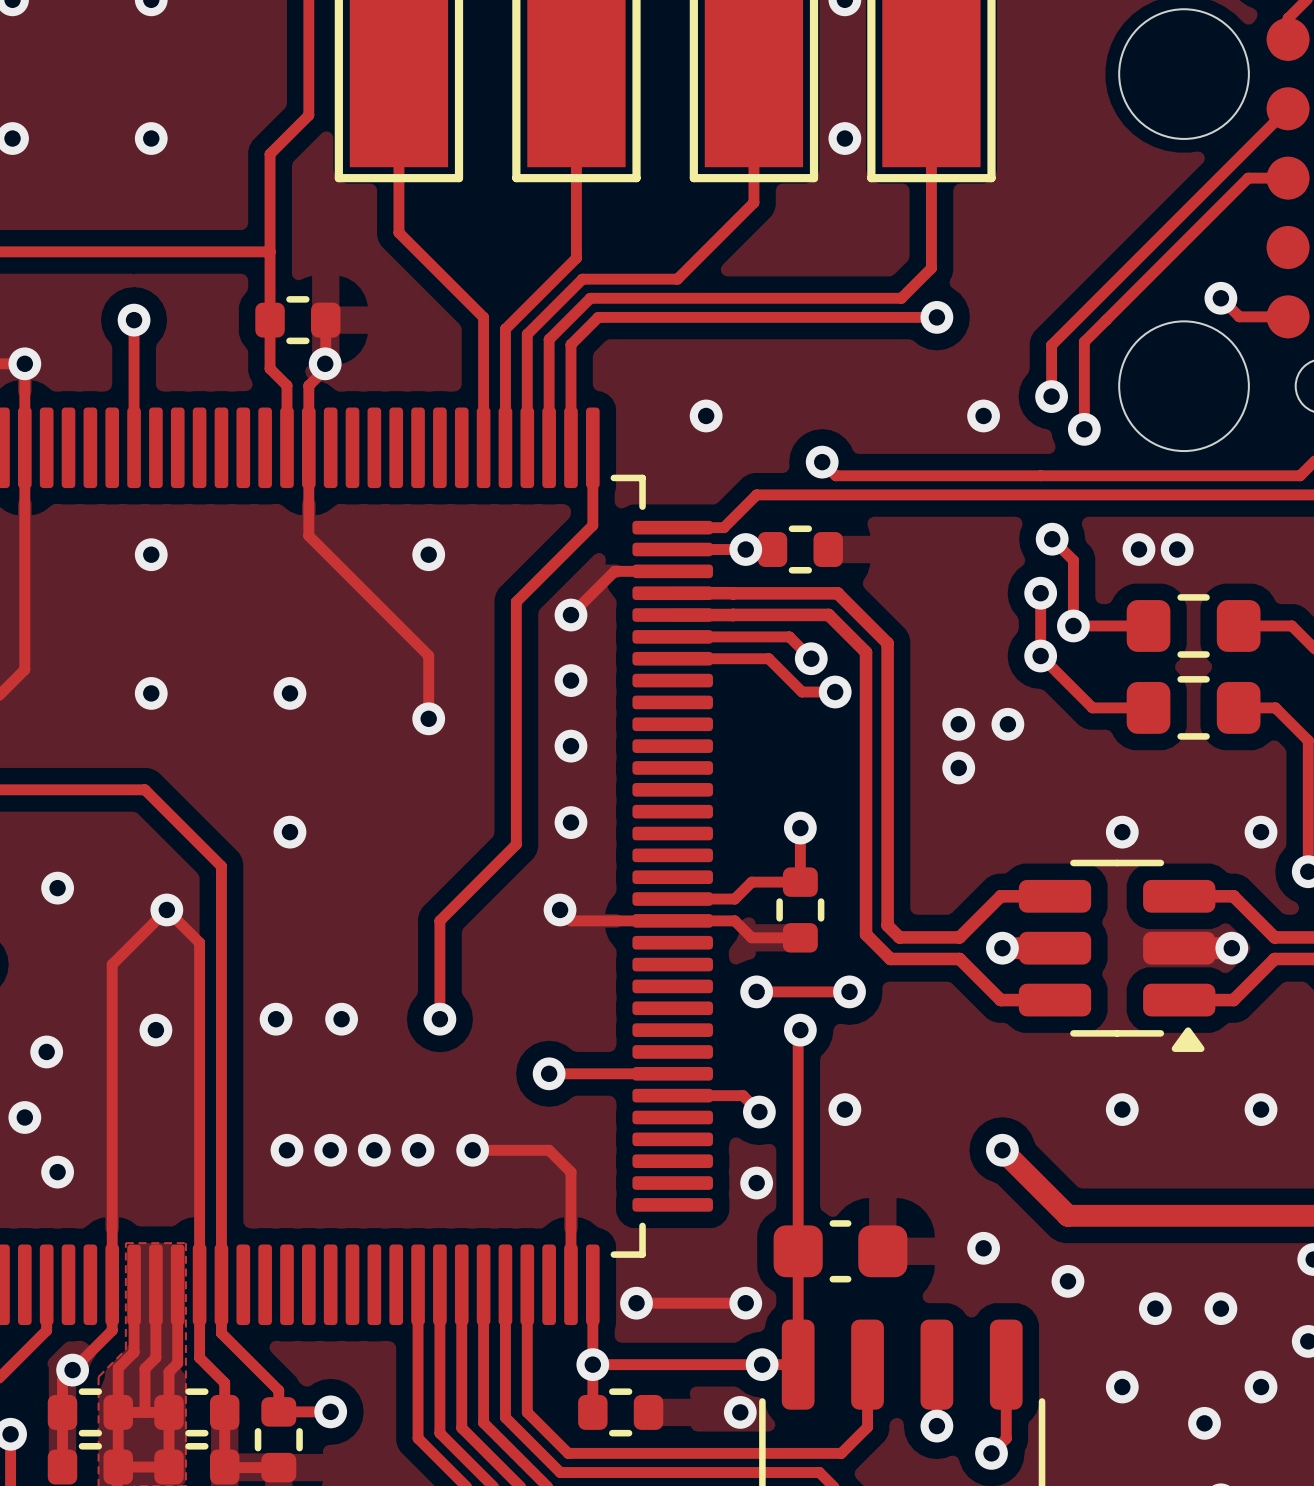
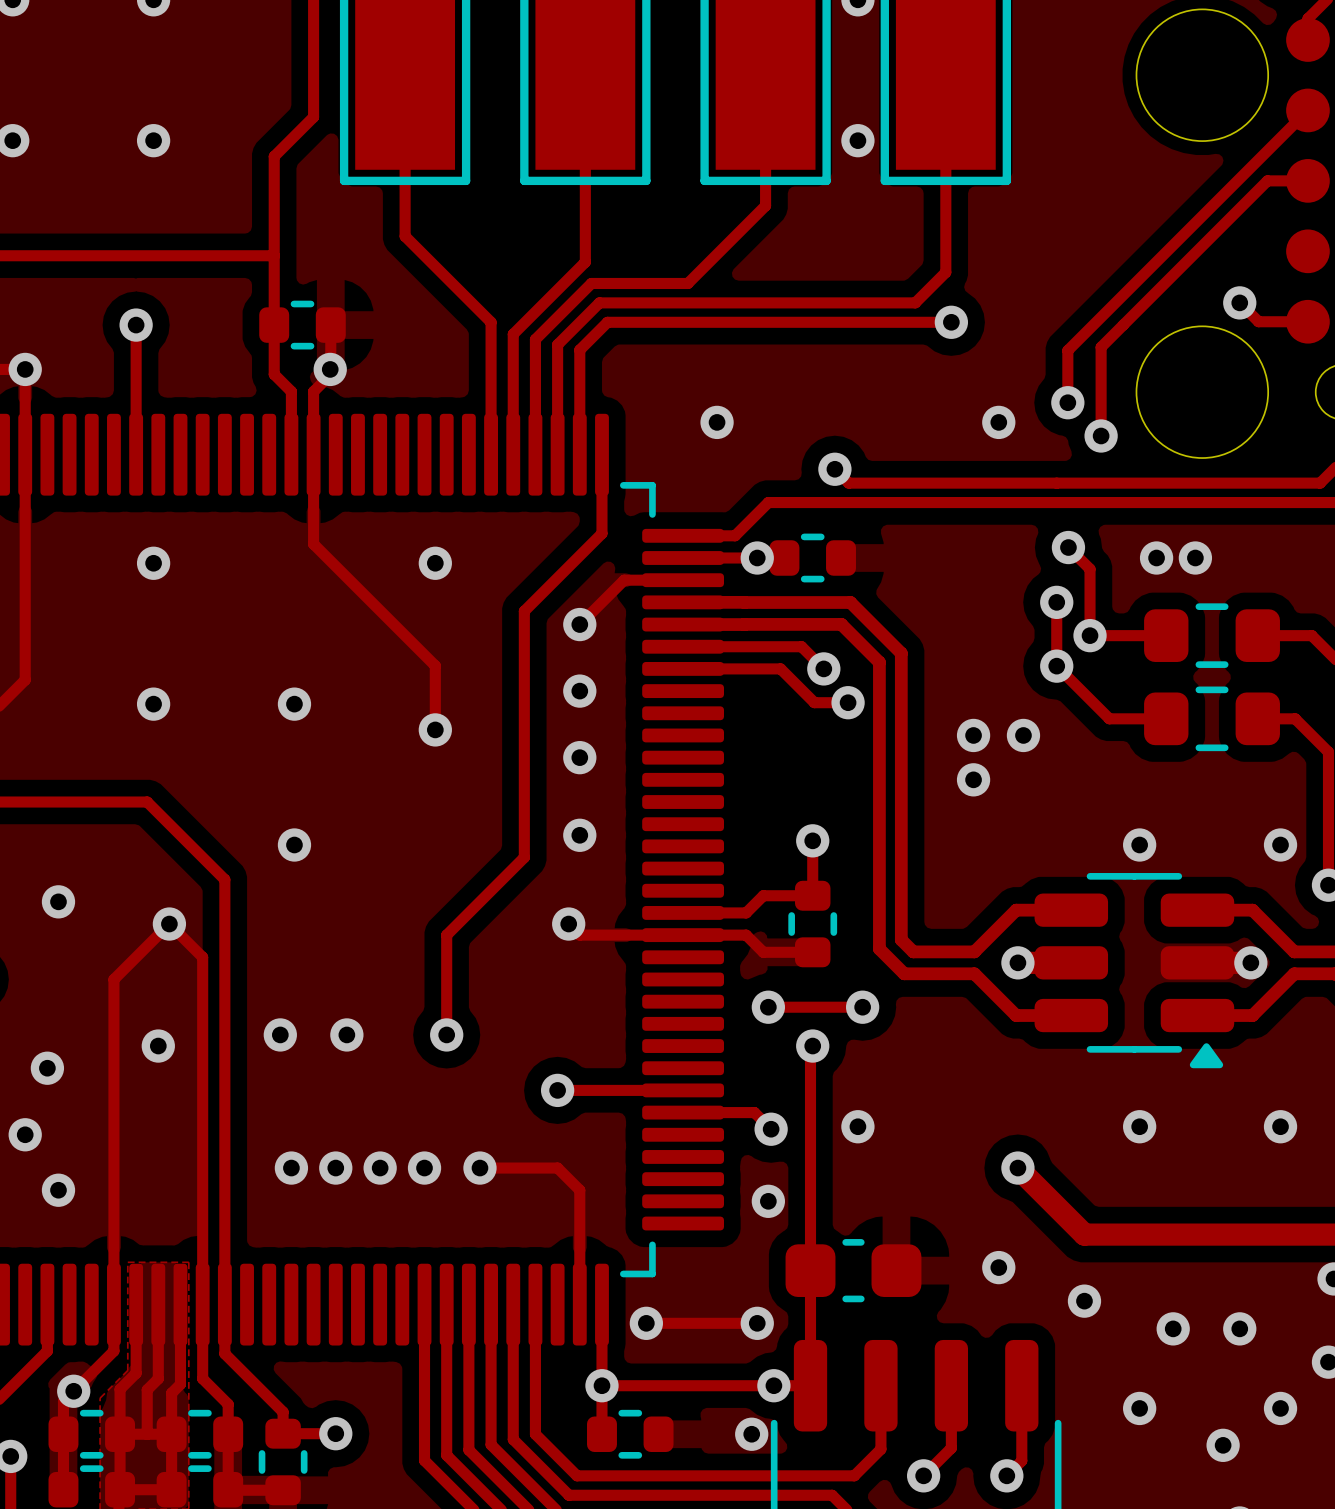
track: none -> (951, 1448) (923, 1475)
via position: (936, 1426) -> (923, 1475)

